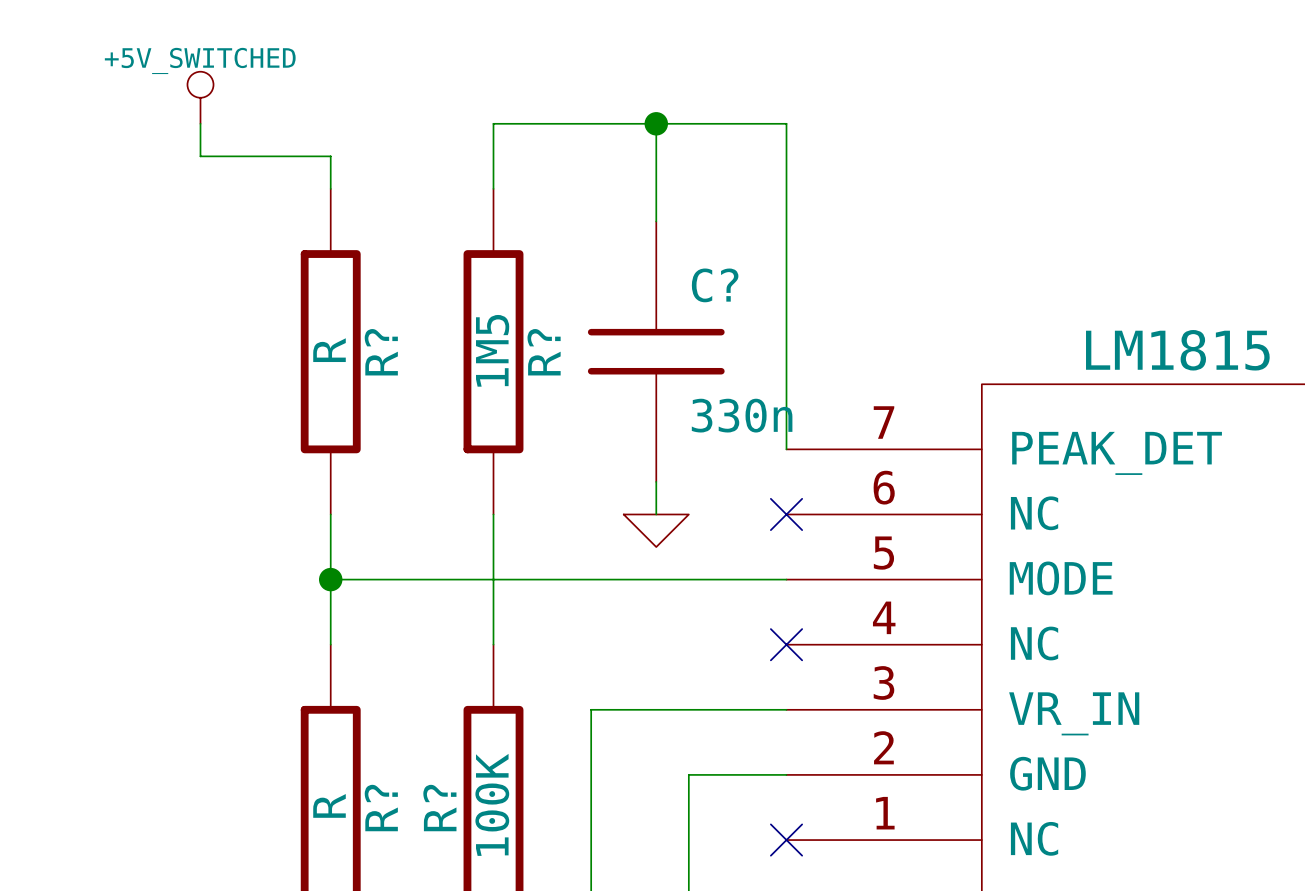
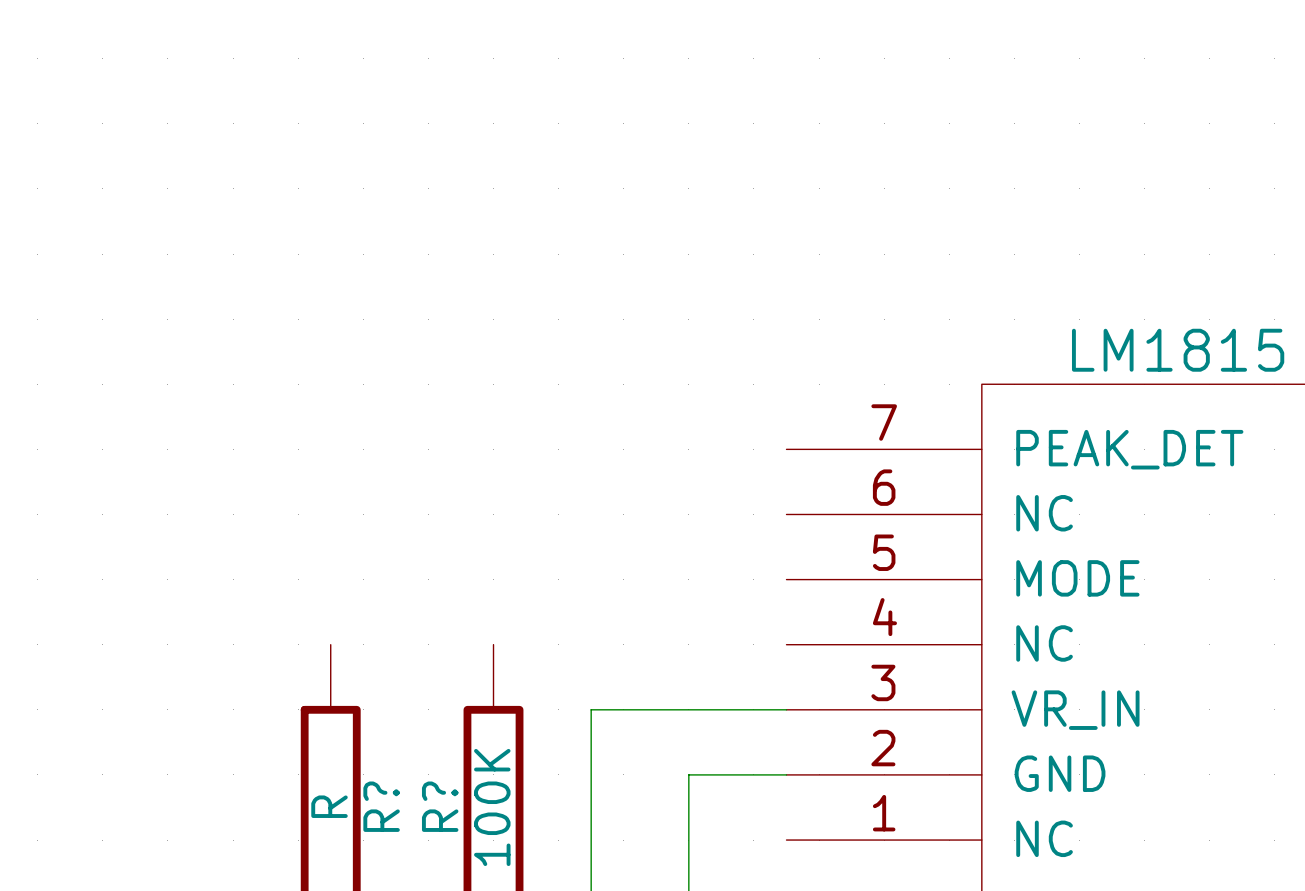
power symbol: +5V_SWITCHED (200, 97) -> none
wire: (200, 123) (200, 156) (330, 156) (330, 188) -> none
wire: (656, 123) (656, 221) -> none
junction: (656, 123) -> none
wire: (493, 188) (493, 123) (786, 123) (786, 449) -> none
R?: R (330, 351) -> none
R?: 1M5 (493, 351) -> none
C?: 330n (656, 351) -> none
wire: (656, 481) (656, 514) -> none
wire: (330, 514) (330, 644) -> none
wire: (493, 514) (493, 644) -> none
no-connect mark: (786, 514) -> none
power symbol: (656, 530) -> none
wire: (330, 579) (786, 579) -> none
junction: (330, 579) -> none
no-connect mark: (786, 644) -> none
no-connect mark: (786, 840) -> none

